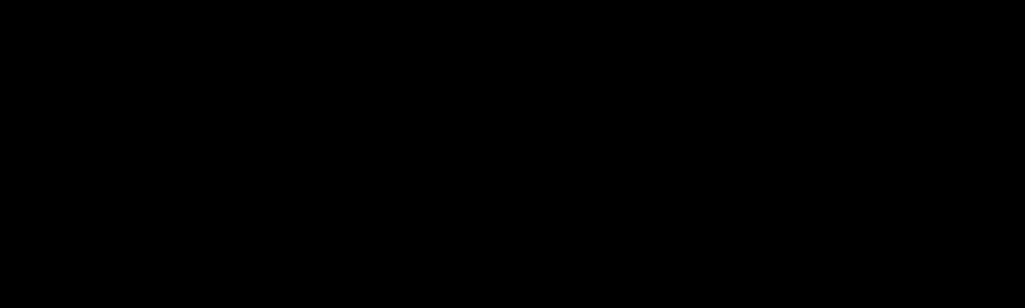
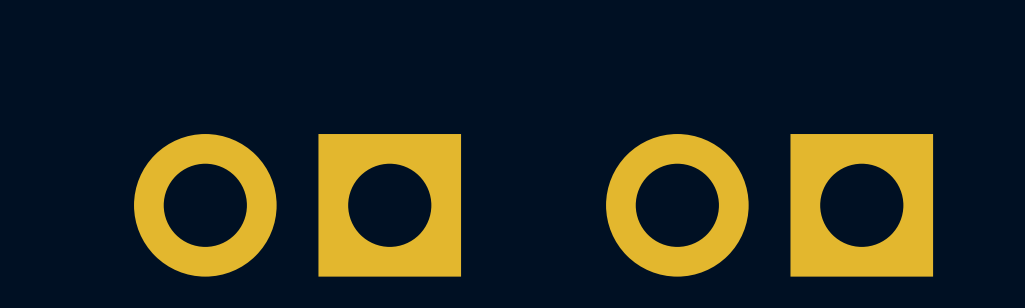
part: none -> (297, 205)
part: none -> (769, 205)

